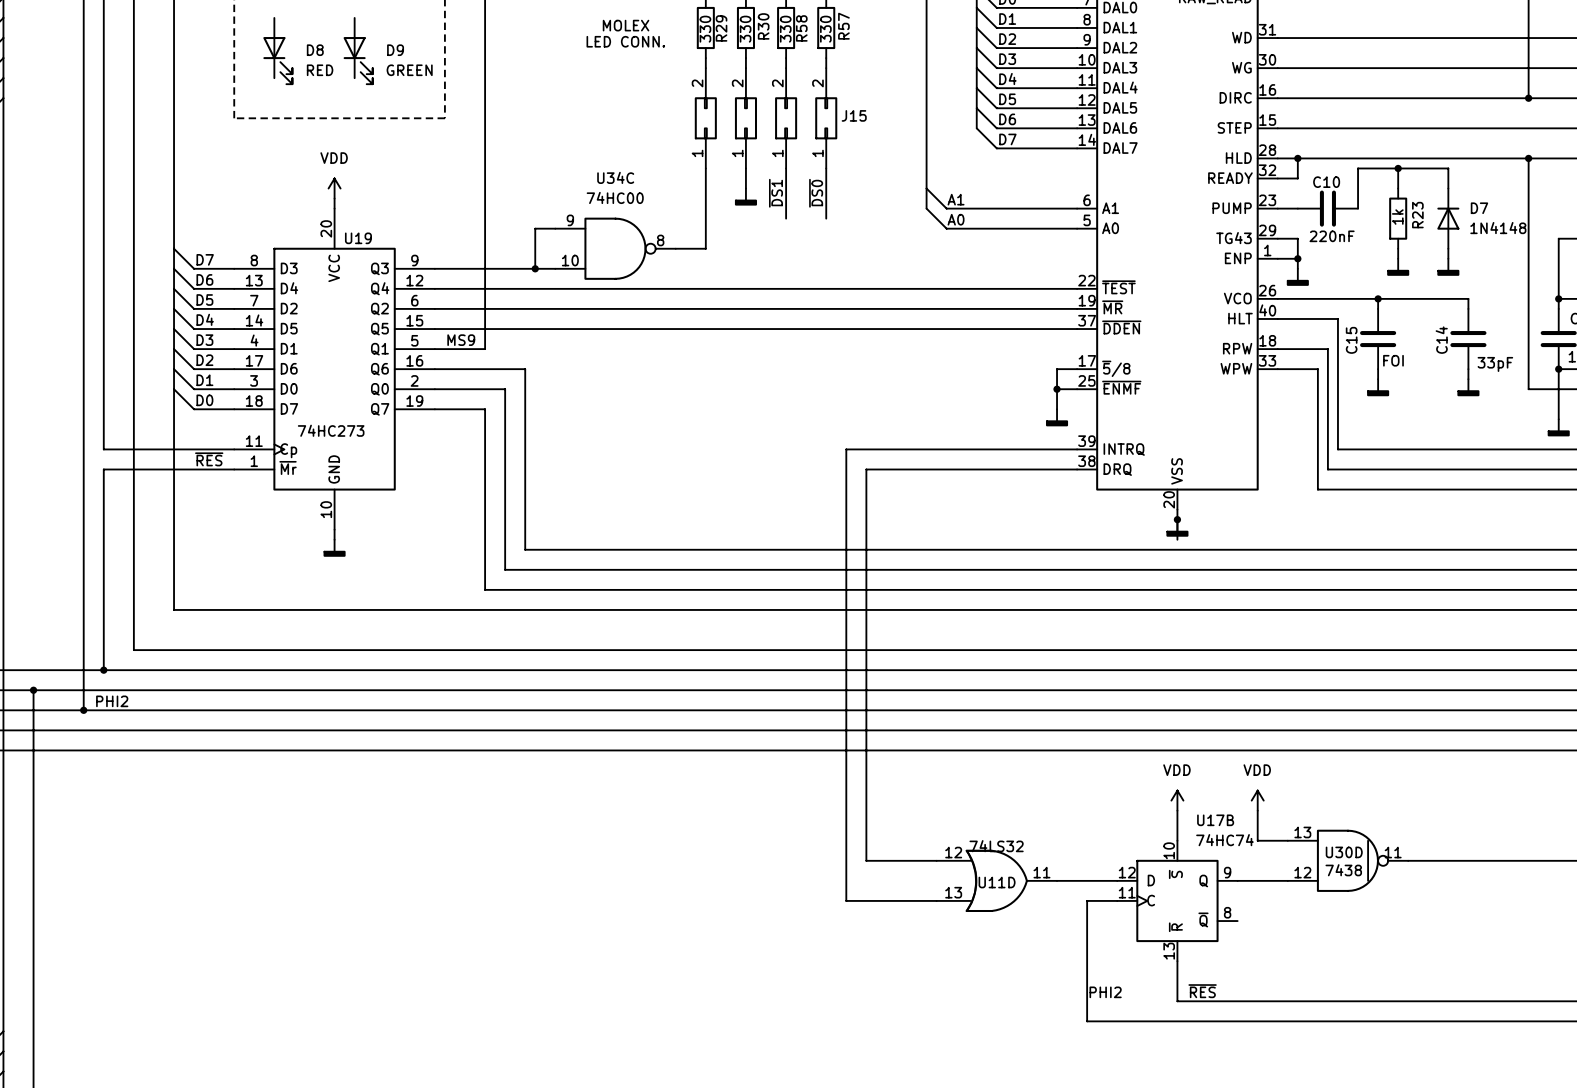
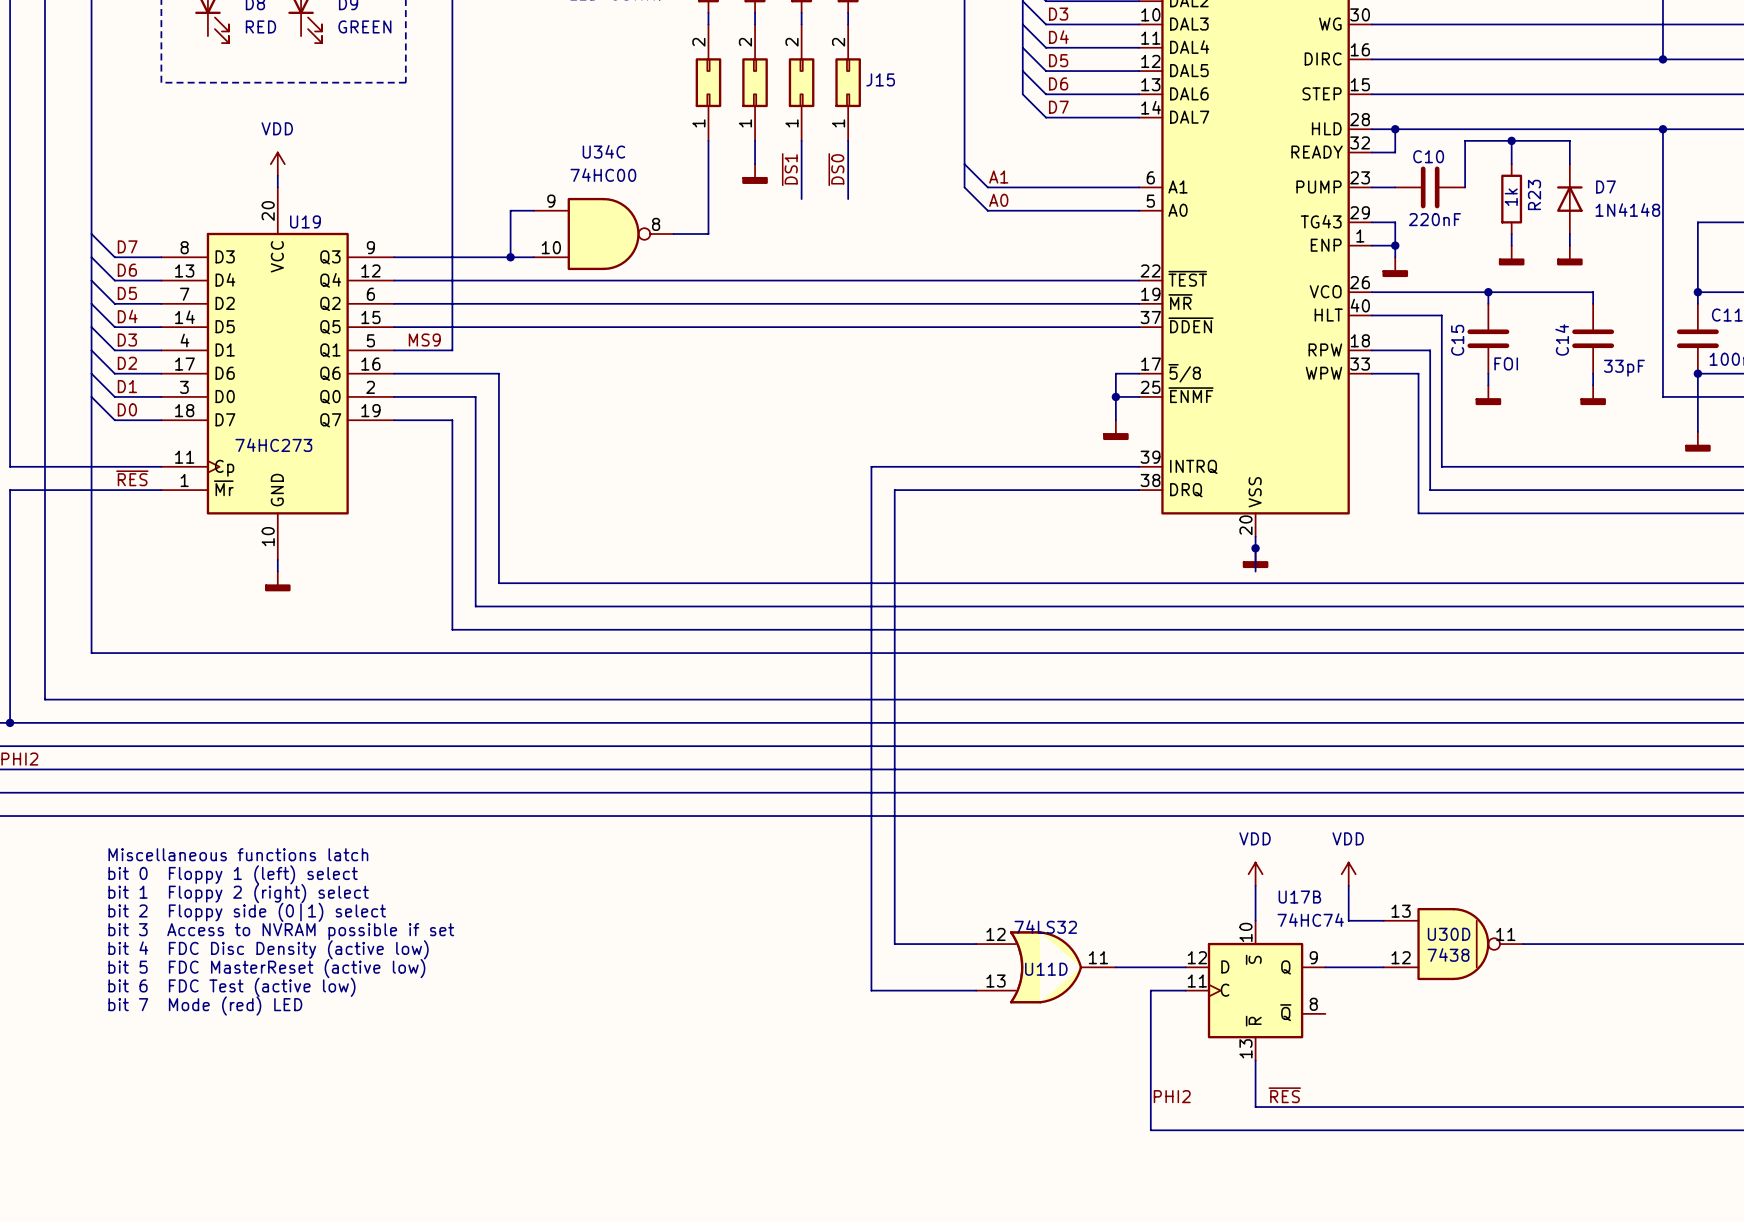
text: none -> Miscellaneous functions latch (238, 854)
text: none -> bit 0 Floppy 1 (left) select (233, 874)
text: none -> bit 1 Floppy 2 (right) select (238, 893)
text: none -> bit 2 Floppy side (0|1) select (247, 912)
text: none -> bit 3 Access to NVRAM possible if set (281, 931)
text: none -> bit 4 FDC Disc Density (active low) (268, 949)
text: none -> bit 5 FDC MasterReset (active low) (266, 968)
text: none -> bit 6 FDC Test (active low) (231, 987)
text: none -> bit 7 Mode (red) LED (205, 1006)

